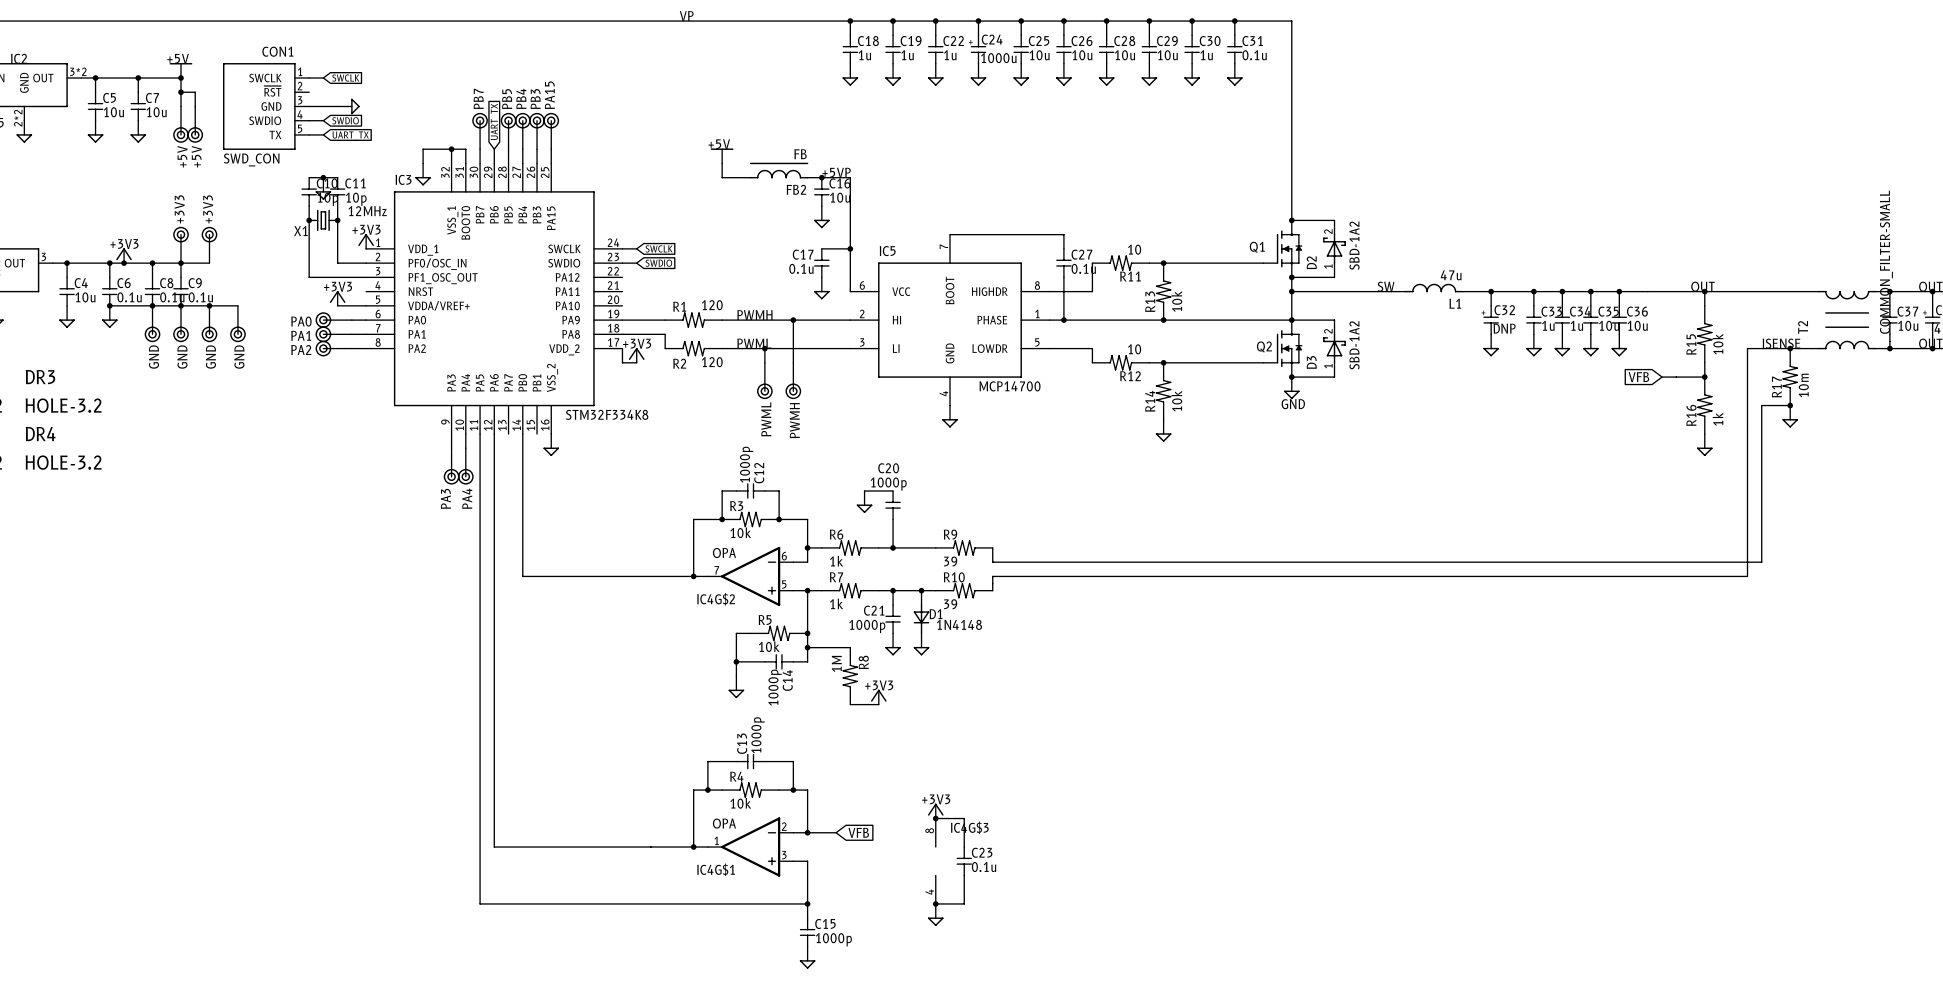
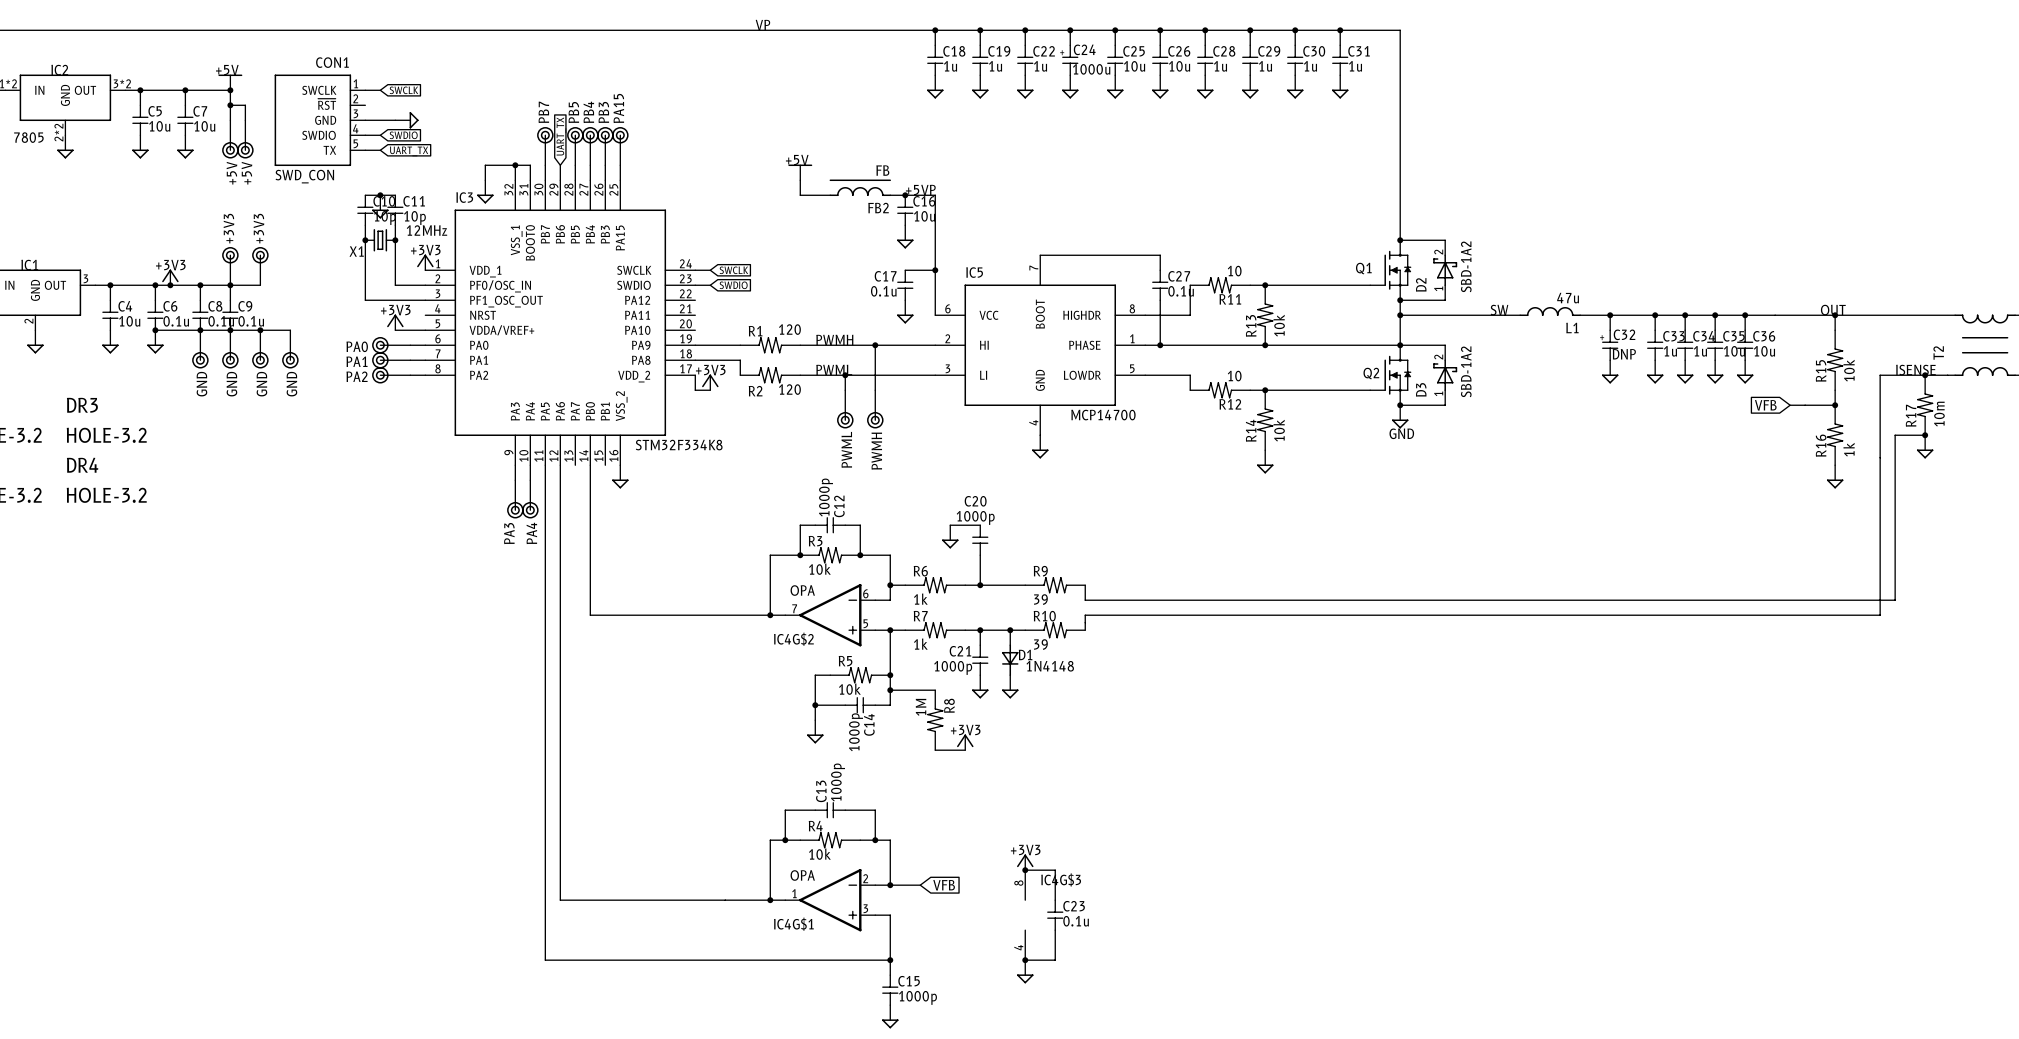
C28 value: 10u (1124, 55) -> 1u (1220, 66)
C29 value: 10u (1167, 55) -> 1u (1265, 66)
C31 value: 0.1u (1254, 55) -> 1u (1355, 66)

